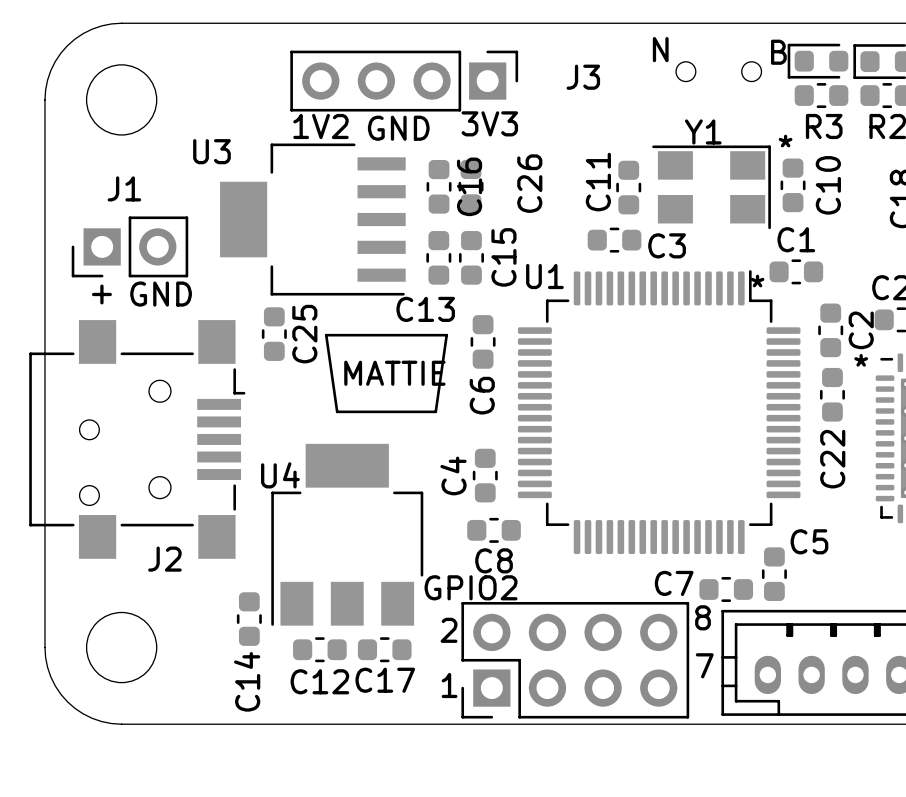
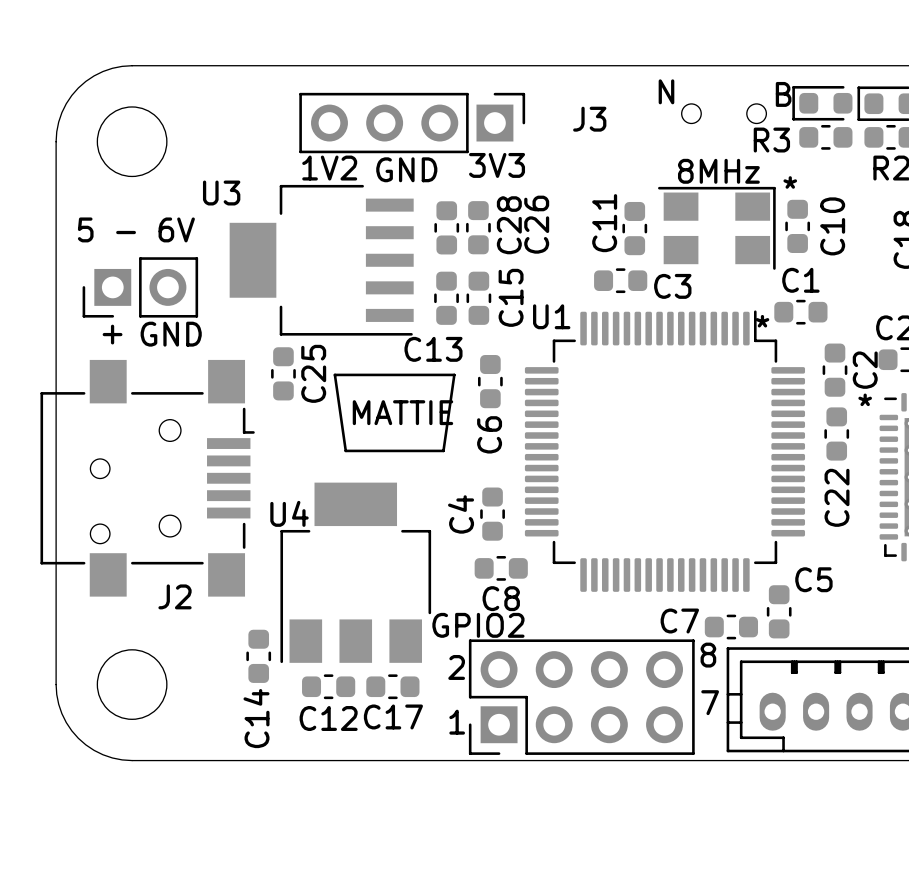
R3 name position: R3 (824, 126) -> R3 (771, 140)
Y1 name: Y1 (703, 131) -> 8MHz (718, 171)
C16 name: C16 (469, 186) -> C28 (509, 225)
J1 name: J1 (124, 188) -> 5 - 6V (136, 229)

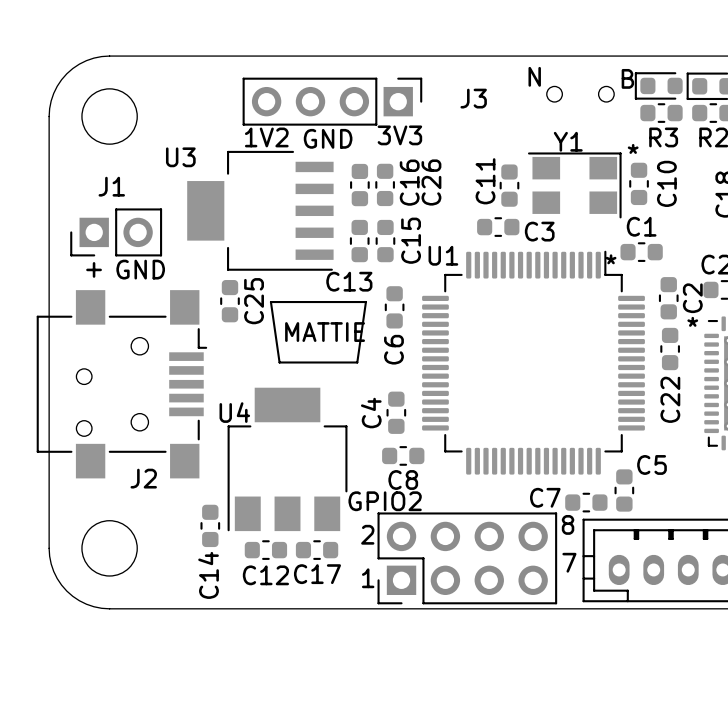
R3 name position: R3 (771, 140) -> R3 (663, 137)
8MHz name: 8MHz (718, 171) -> Y1 (568, 141)
C28 name: C28 (509, 225) -> C16 (409, 182)
5 - 6V name: 5 - 6V (136, 229) -> J1 (111, 186)

